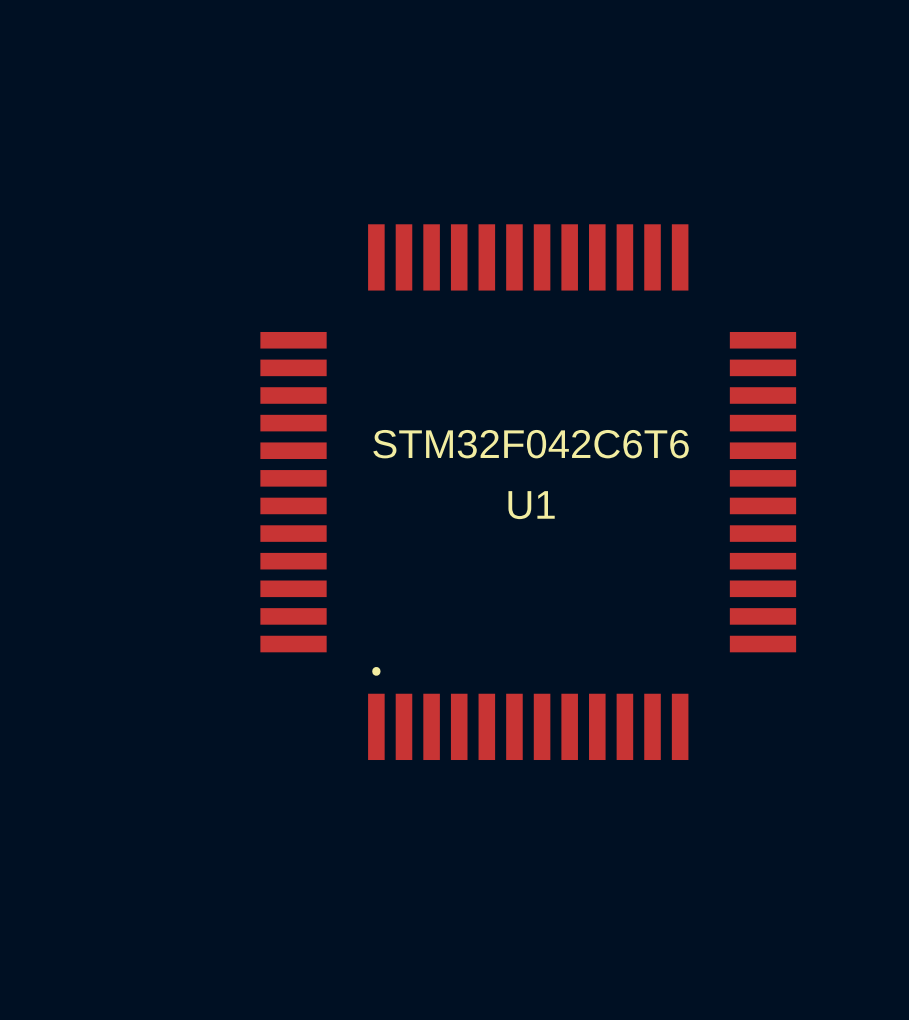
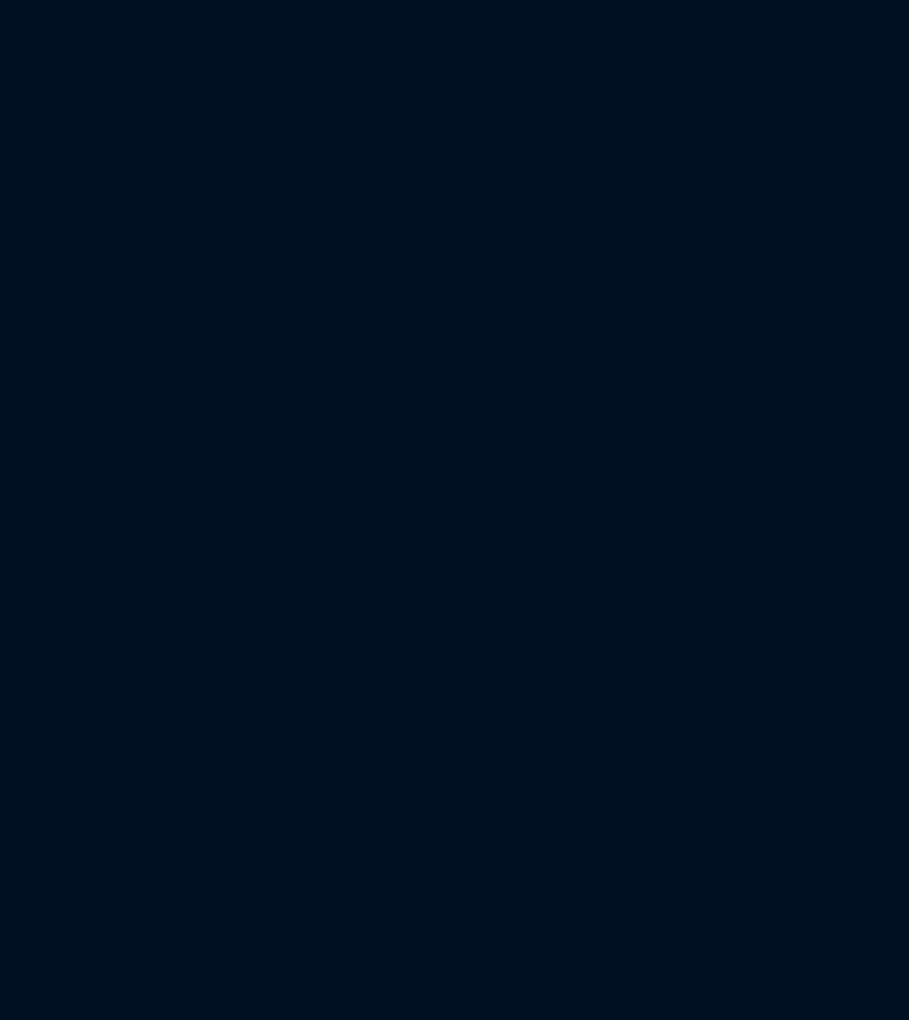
U1: STM32F042C6T6 (528, 492) -> none

